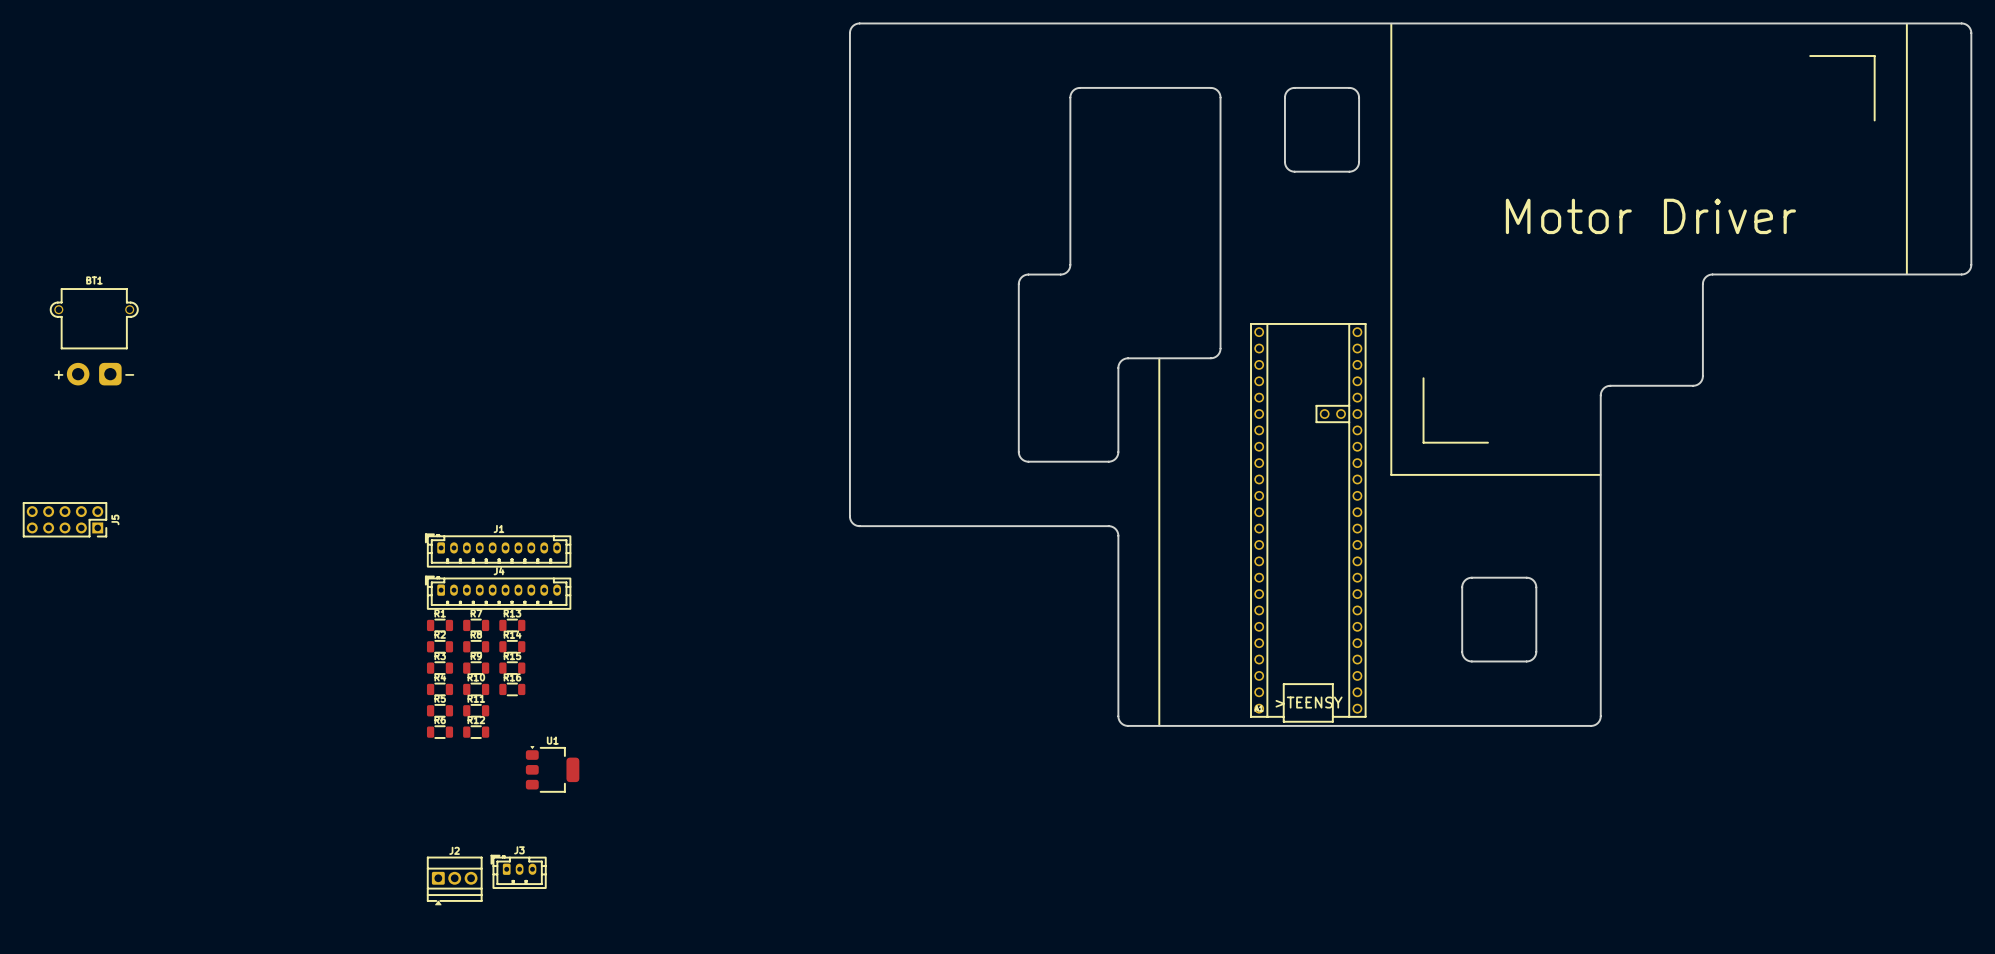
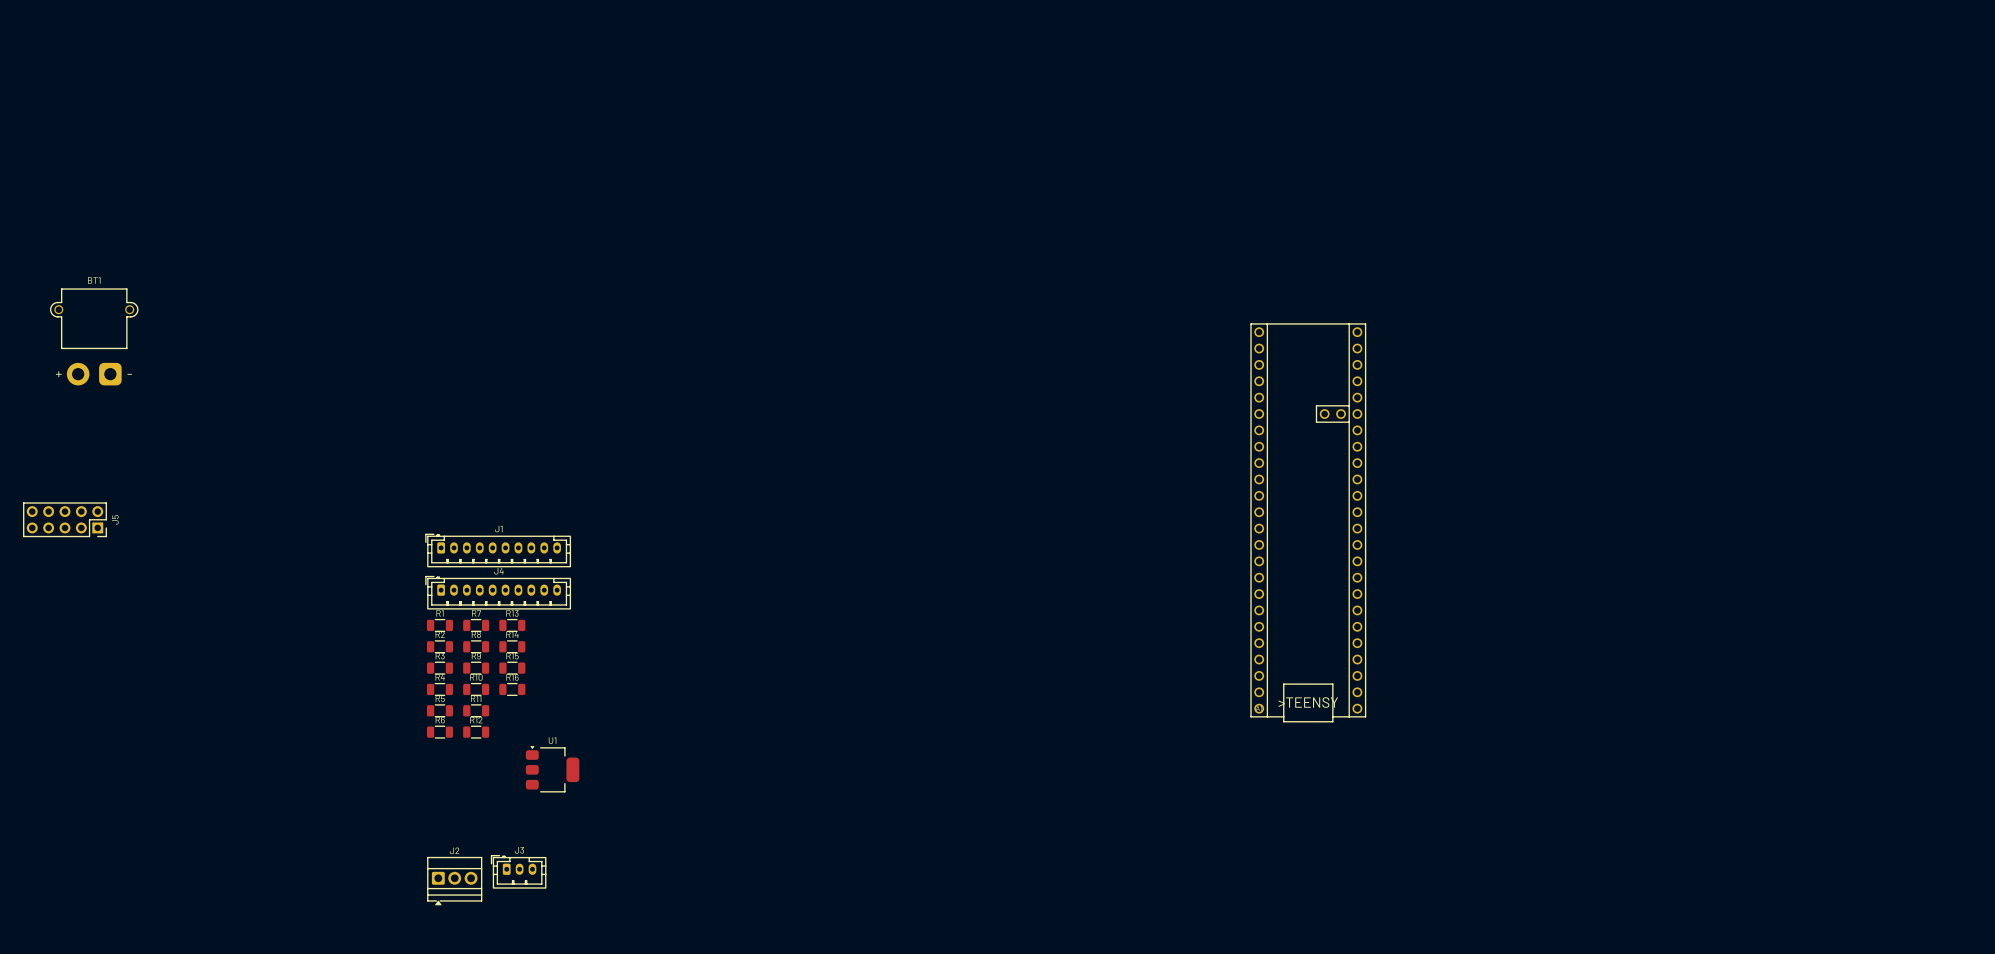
board edge: (859, 23) (1964, 23) (1969, 27) (1971, 33) (1970, 267) (1967, 272) (1961, 274) (1710, 274) (1705, 277) (1702, 282) (1702, 376) (1700, 382) (1693, 385) (1609, 385) (1602, 389) (1600, 395) (1600, 716) (1595, 724) (1125, 725) (1120, 722) (1118, 716) (1118, 535) (1114, 528) (1108, 526) (859, 526) (854, 524) (850, 520) (849, 33) (852, 26) (859, 23) -> none
line: (1391, 23) (1391, 474) (1600, 474) -> none
line: (1906, 23) (1906, 274) -> none
line: (1810, 56) (1874, 56) (1874, 120) -> none
board edge: (1080, 87) (1210, 87) (1219, 92) (1220, 349) (1217, 355) (1212, 358) (1128, 358) (1121, 361) (1118, 367) (1118, 453) (1113, 460) (1027, 461) (1021, 458) (1018, 452) (1018, 282) (1021, 277) (1025, 274) (1061, 274) (1067, 271) (1070, 267) (1070, 97) (1073, 90) (1080, 87) -> none
board edge: (1294, 87) (1349, 87) (1357, 91) (1359, 97) (1359, 162) (1355, 169) (1349, 171) (1294, 171) (1286, 167) (1284, 162) (1285, 96) (1287, 90) (1294, 87) -> none
text: Motor Driver (1650, 216) -> none
line: (1159, 358) (1159, 725) -> none
line: (1423, 378) (1423, 442) (1487, 442) -> none
board edge: (1471, 577) (1526, 577) (1534, 581) (1536, 587) (1536, 651) (1532, 659) (1526, 661) (1471, 661) (1464, 657) (1462, 651) (1462, 586) (1465, 580) (1471, 577) -> none

